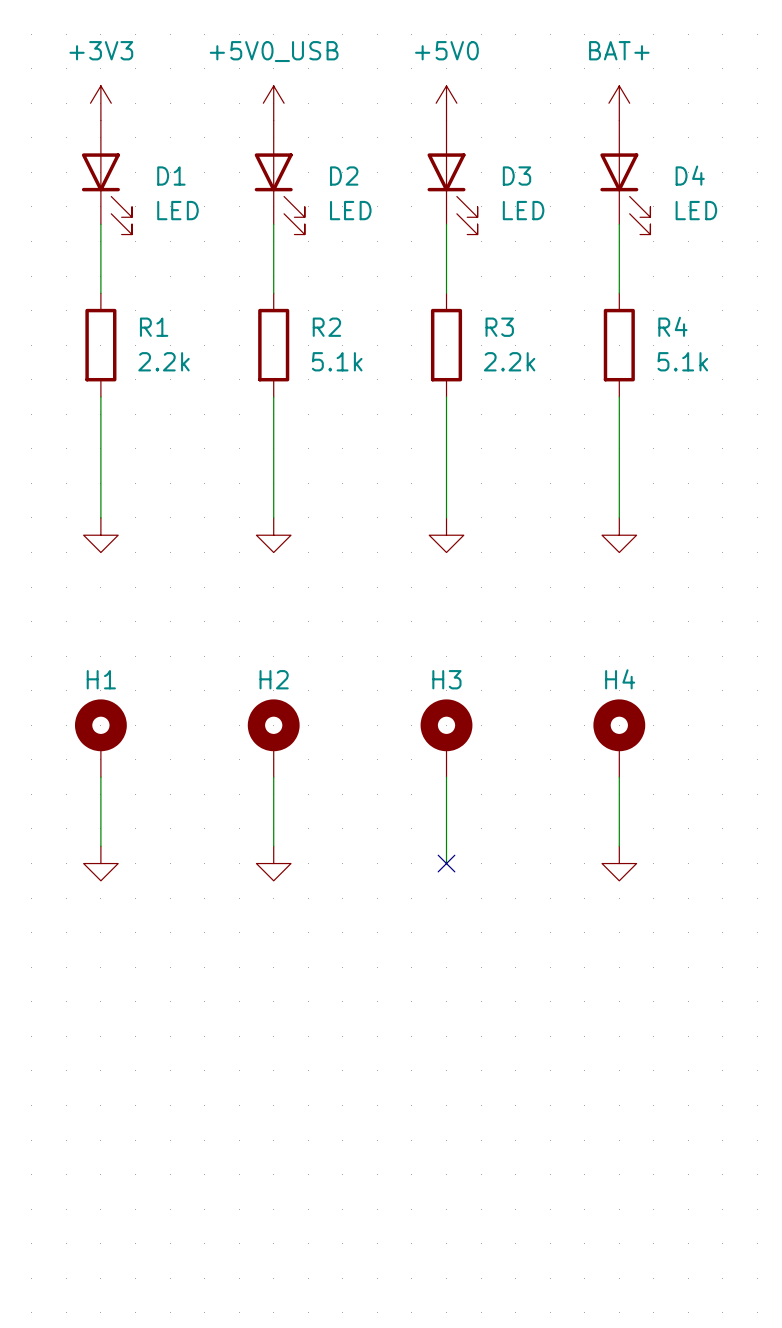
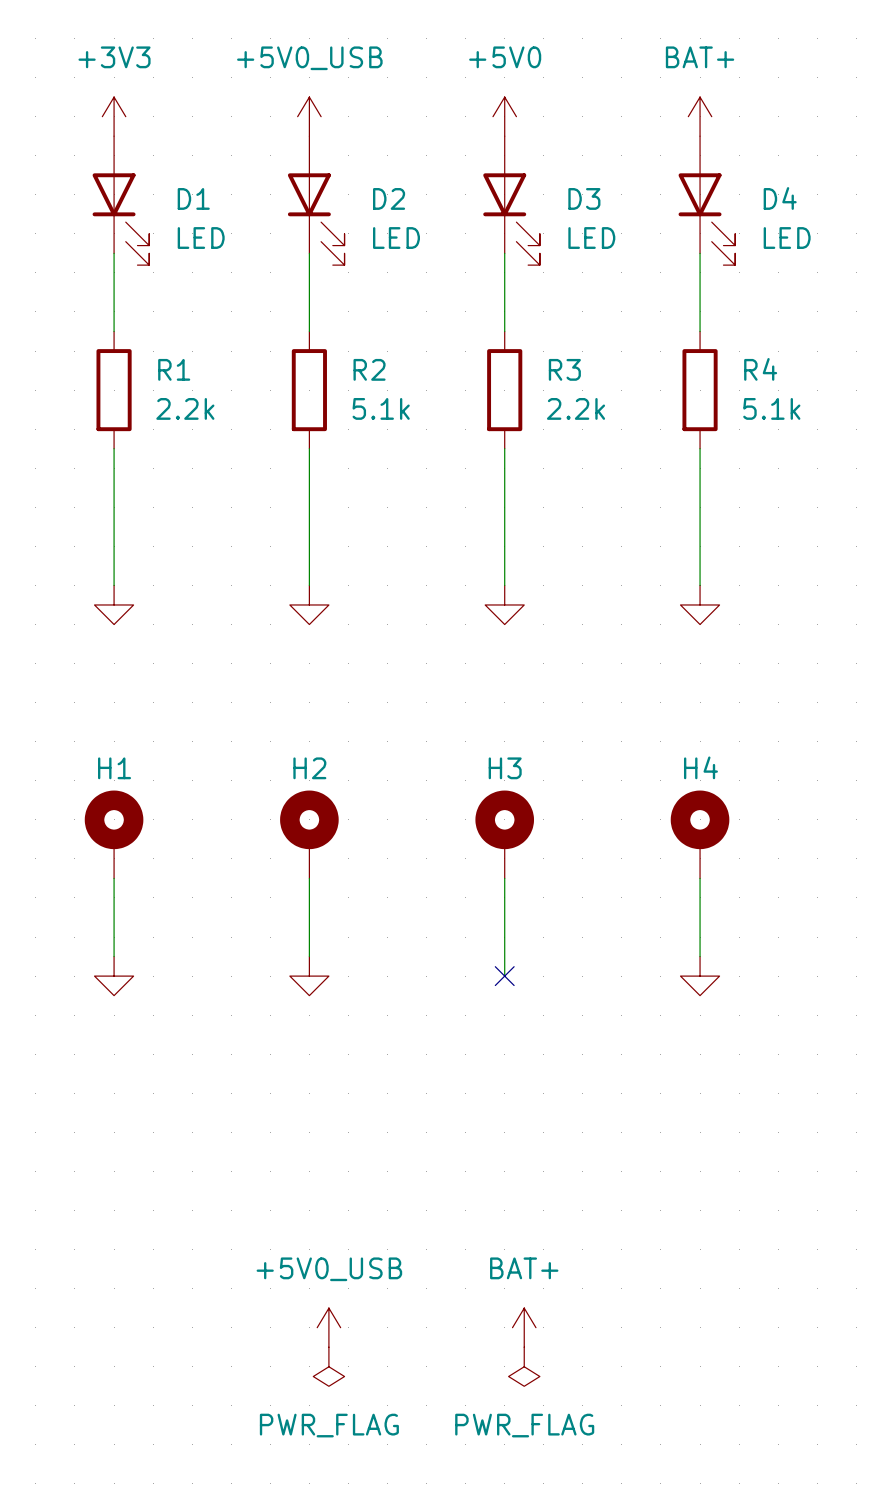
power symbol: none -> +5V0_USB (328, 1327)
power symbol: none -> BAT+ (524, 1327)
power symbol: none -> PWR_FLAG (328, 1366)
power symbol: none -> PWR_FLAG (524, 1366)

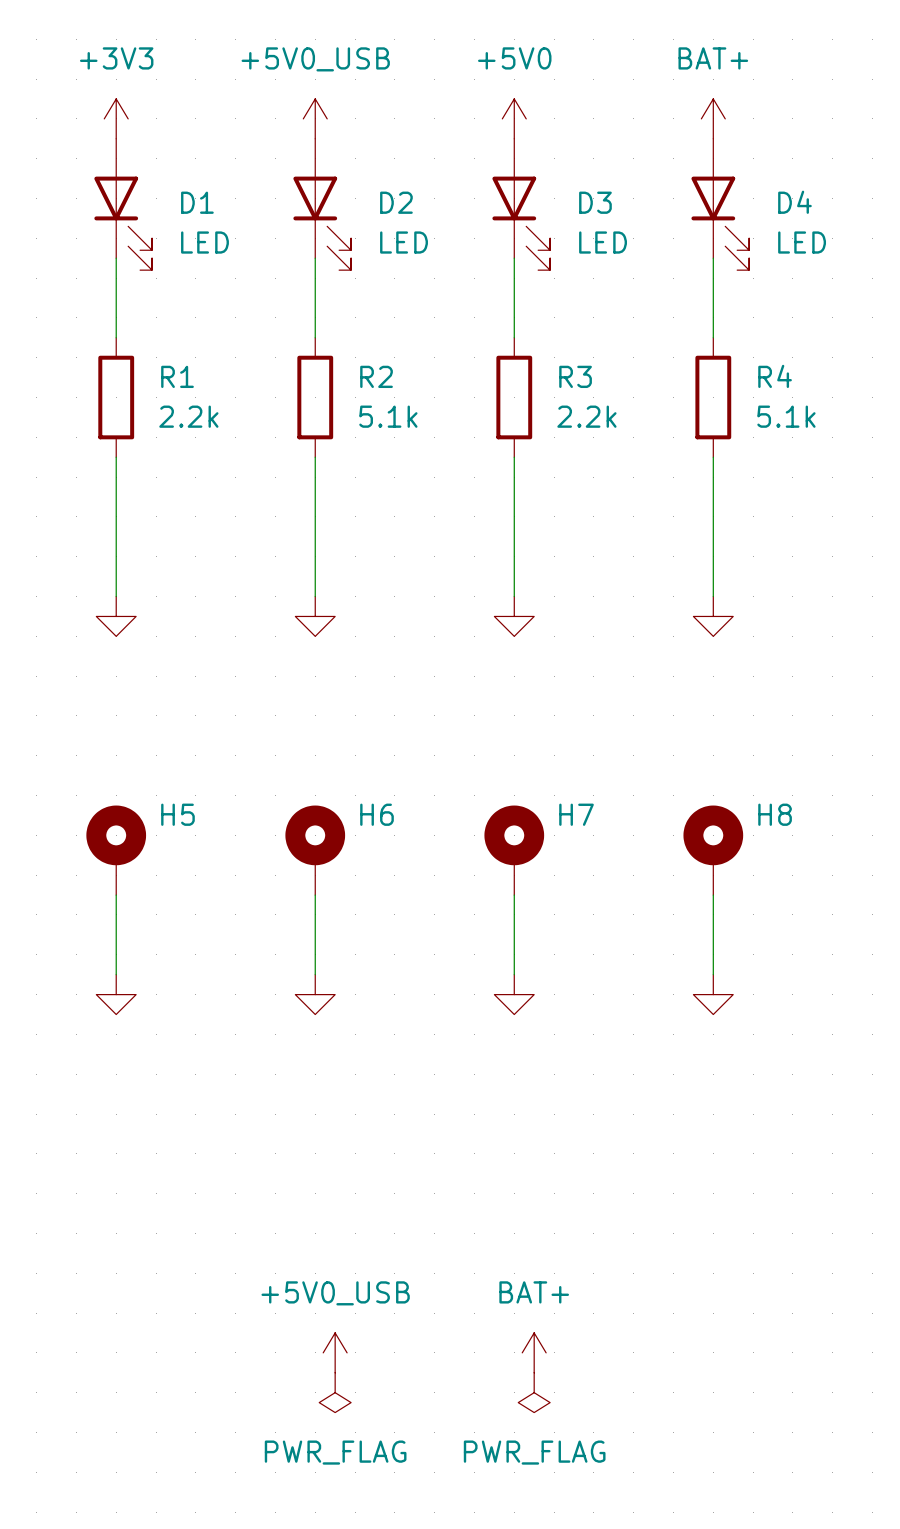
H4 name: H4 (700, 767) -> H8 (775, 814)
H1 name: H1 (114, 768) -> H5 (177, 814)
H2 name: H2 (309, 768) -> H6 (377, 814)
H3 name: H3 (505, 768) -> H7 (576, 814)
no-connect mark: (504, 976) -> none
power symbol: none -> (514, 994)

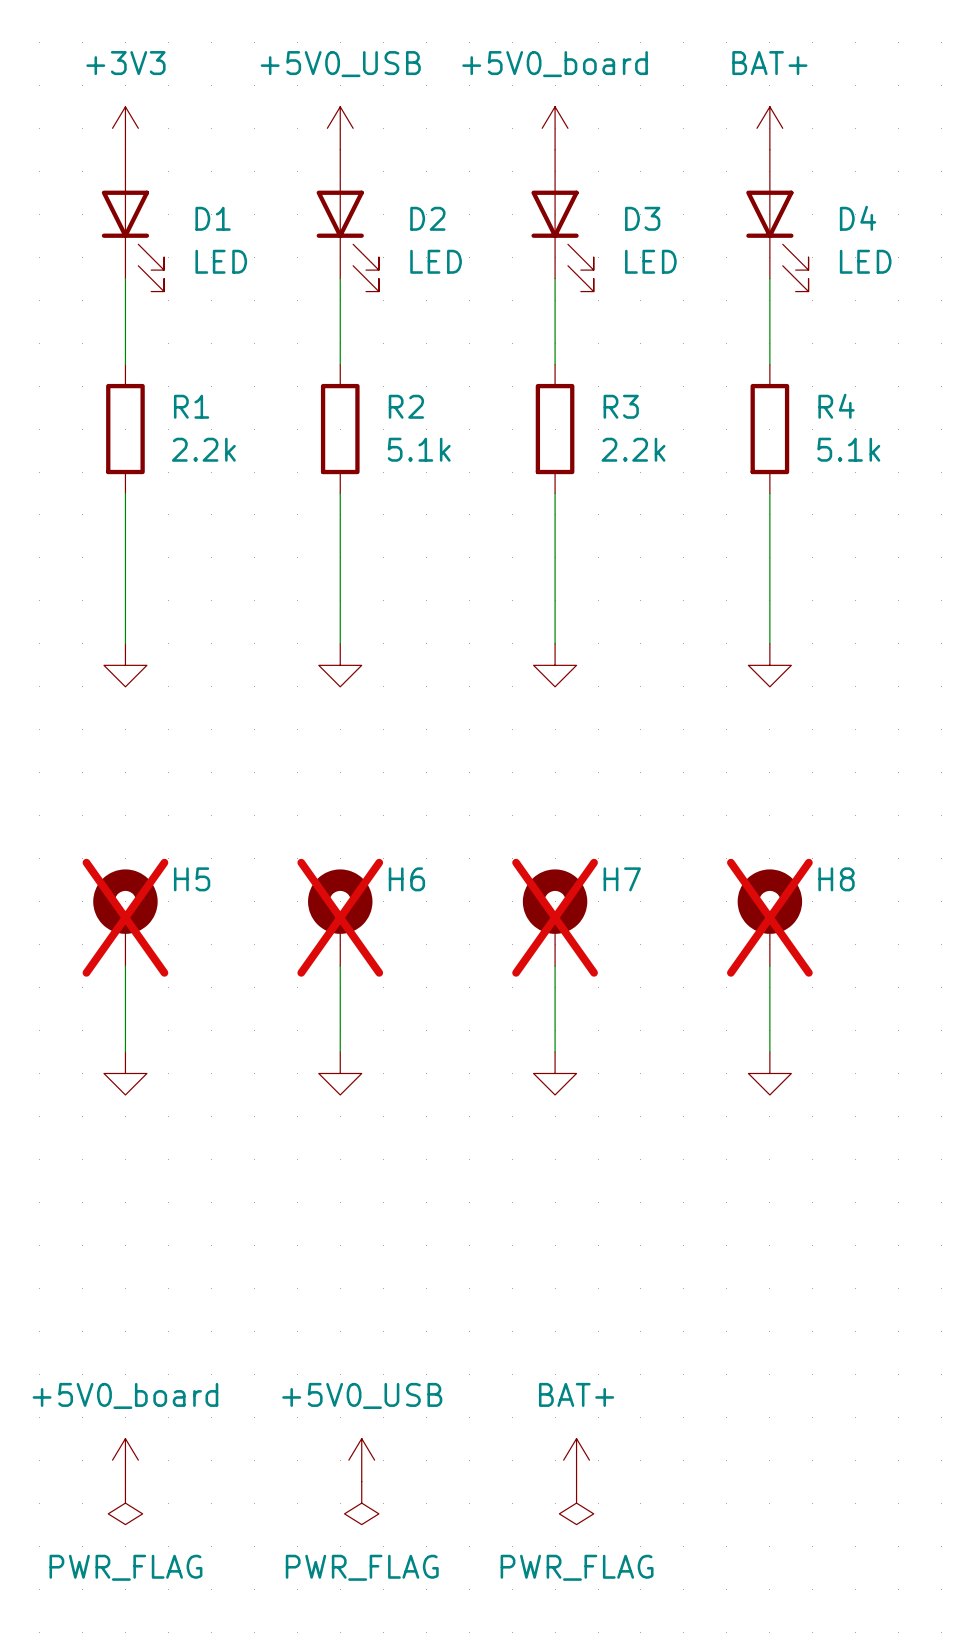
power symbol: +5V0 (514, 118) -> +5V0_board (555, 128)
H5 do-not-place cross: none -> (125, 917)
H6 do-not-place cross: none -> (340, 917)
H7 do-not-place cross: none -> (555, 917)
H8 do-not-place cross: none -> (769, 917)
power symbol: none -> +5V0_board (125, 1460)
power symbol: none -> PWR_FLAG (125, 1503)

